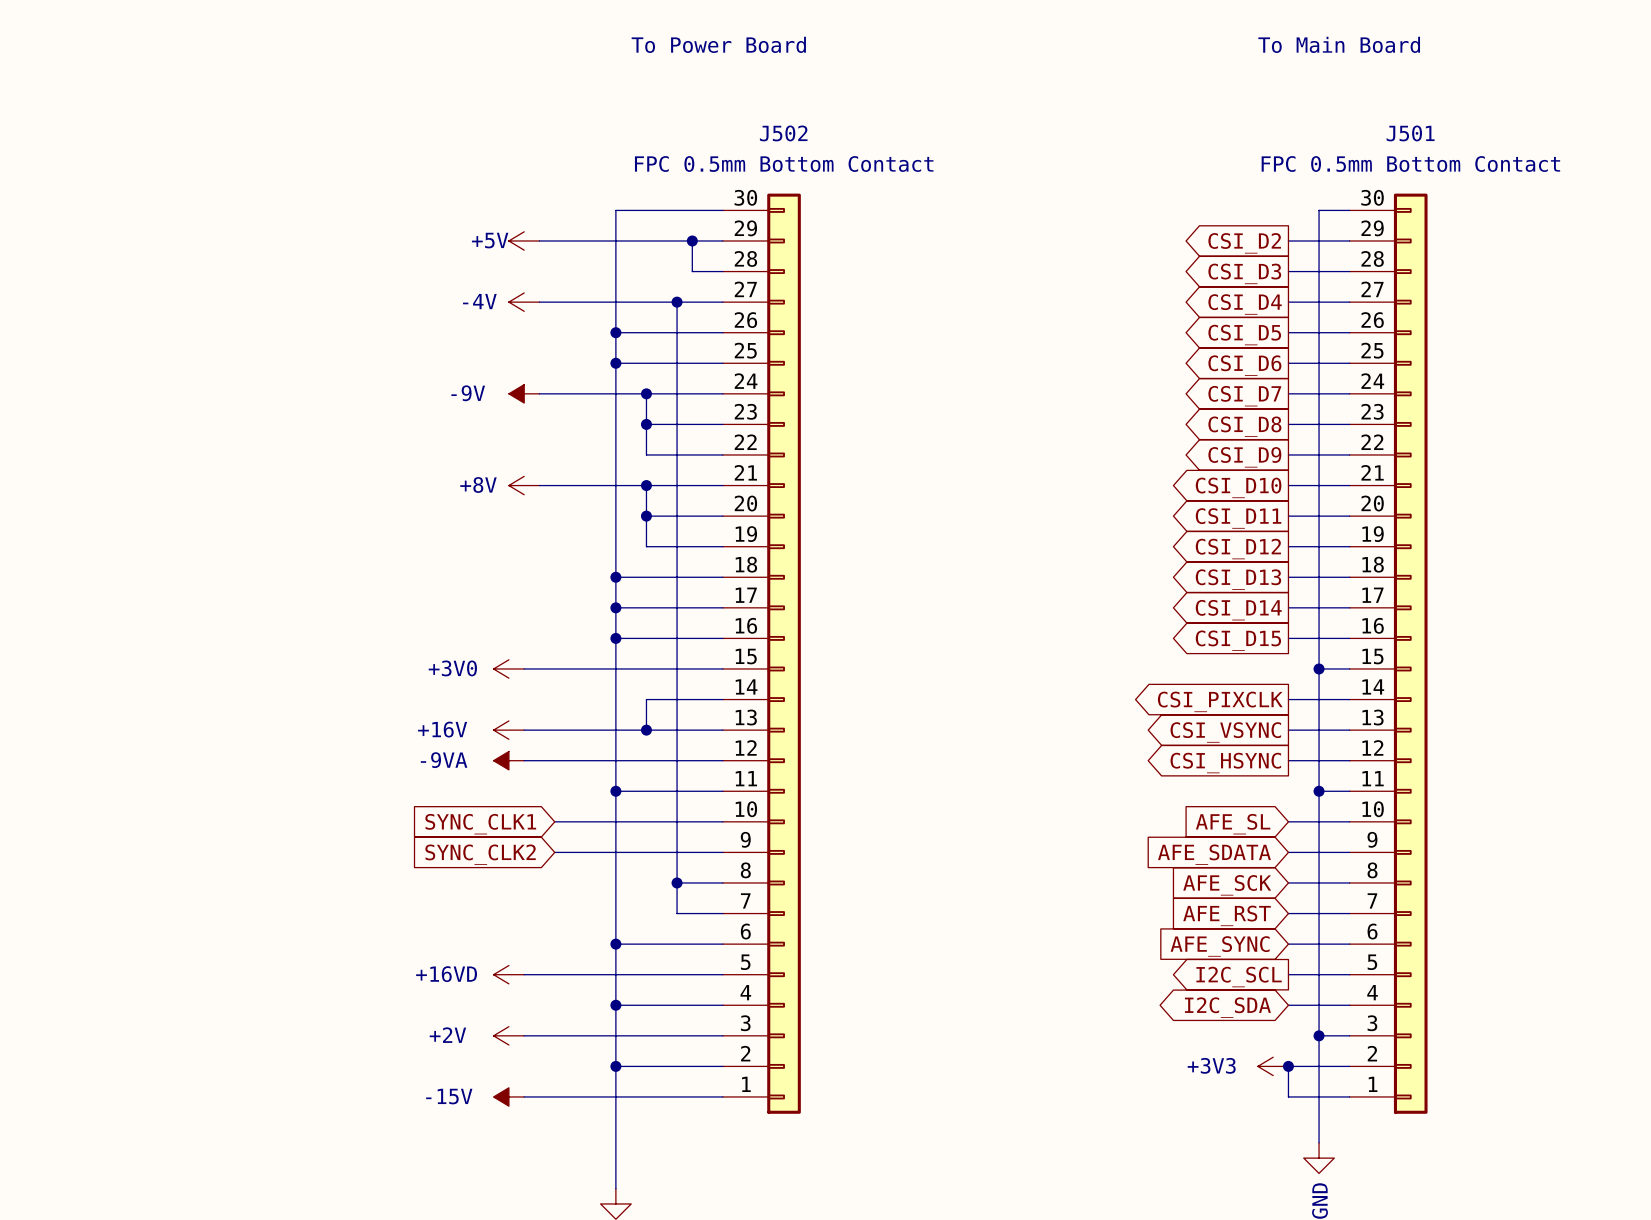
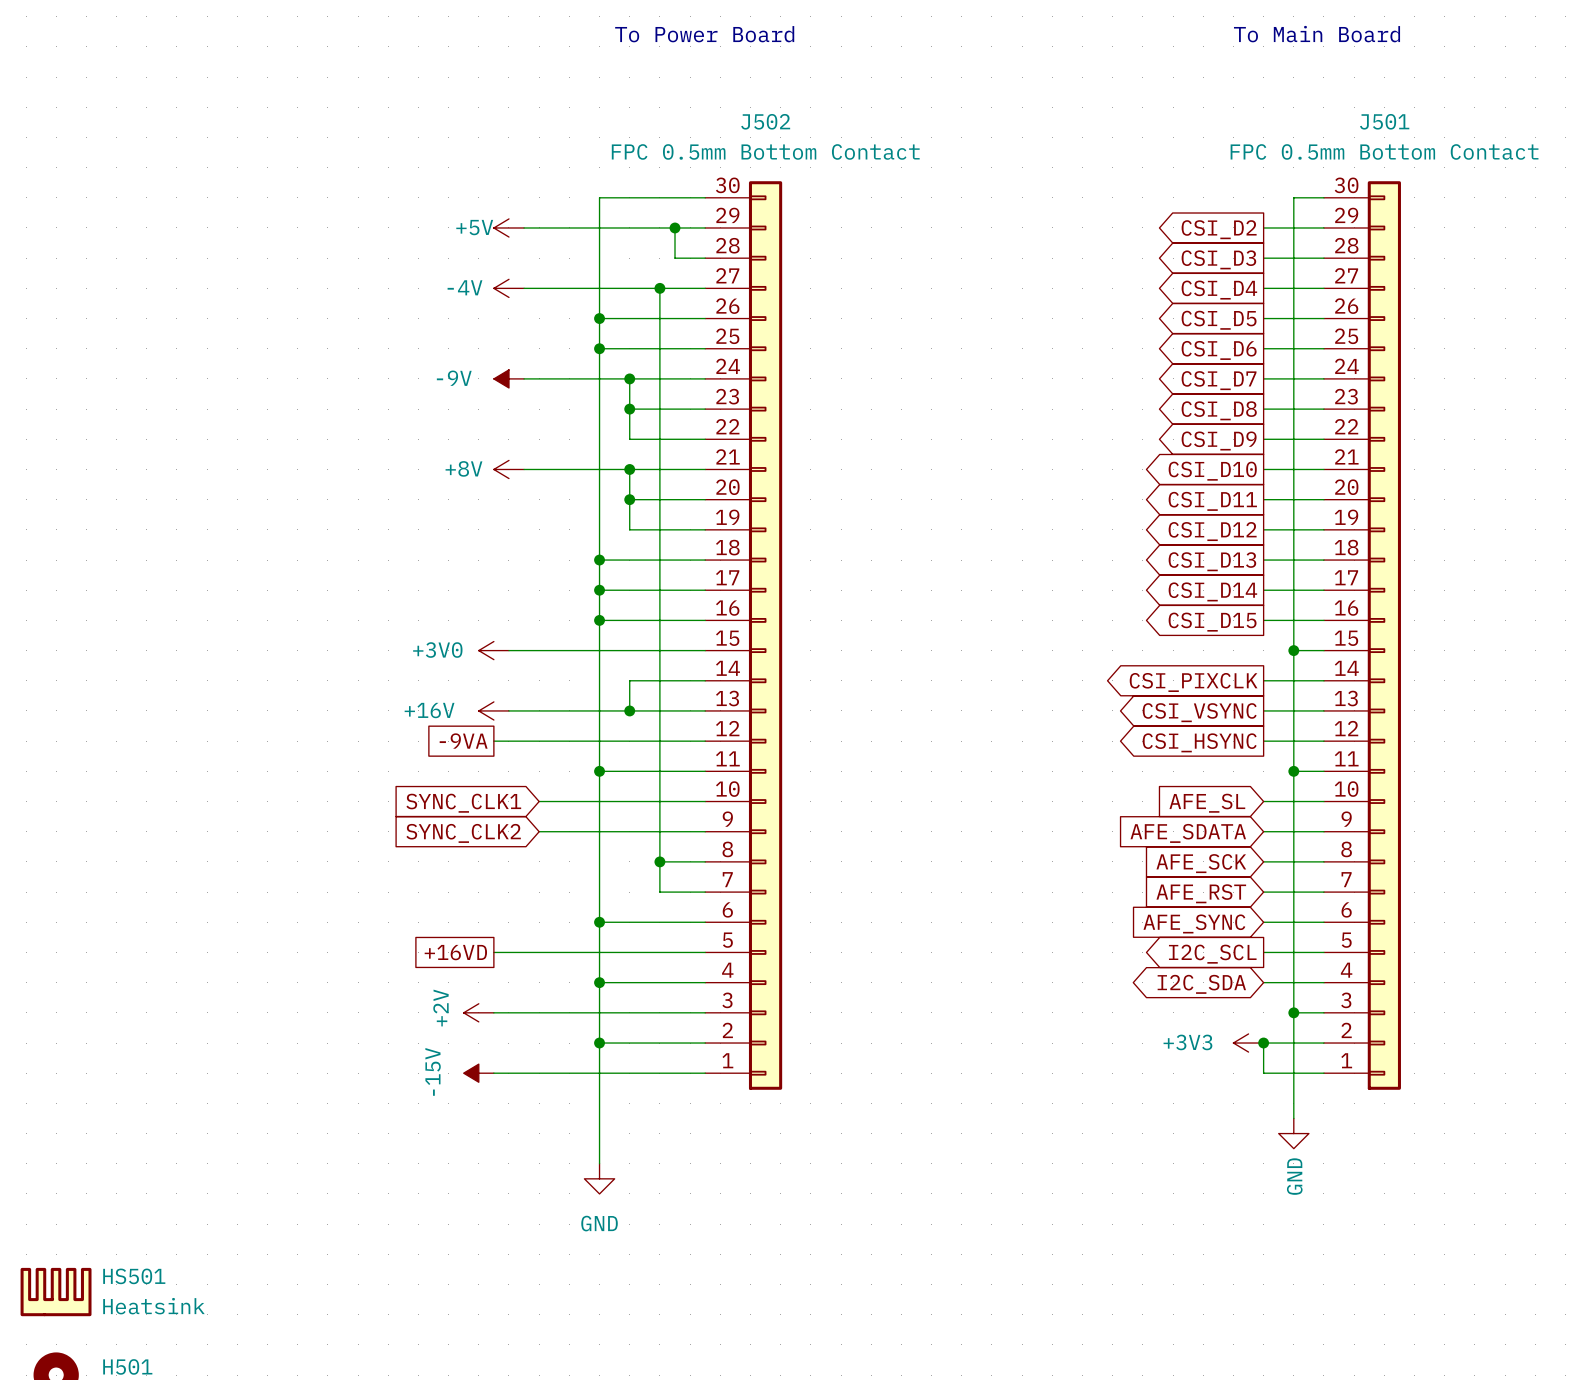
global label: none -> -9VA (463, 741)
power symbol: -9VA (508, 760) -> none
global label: none -> +16VD (455, 952)
power symbol: +16VD (508, 974) -> none
power symbol text rotation: 0° (447, 1035) -> 90° counterclockwise (440, 1008)
power symbol position: +2V (508, 1035) -> +2V (478, 1012)
power symbol text rotation: 0° (449, 1096) -> 90° counterclockwise (433, 1071)
power symbol position: -15V (508, 1096) -> -15V (478, 1073)

